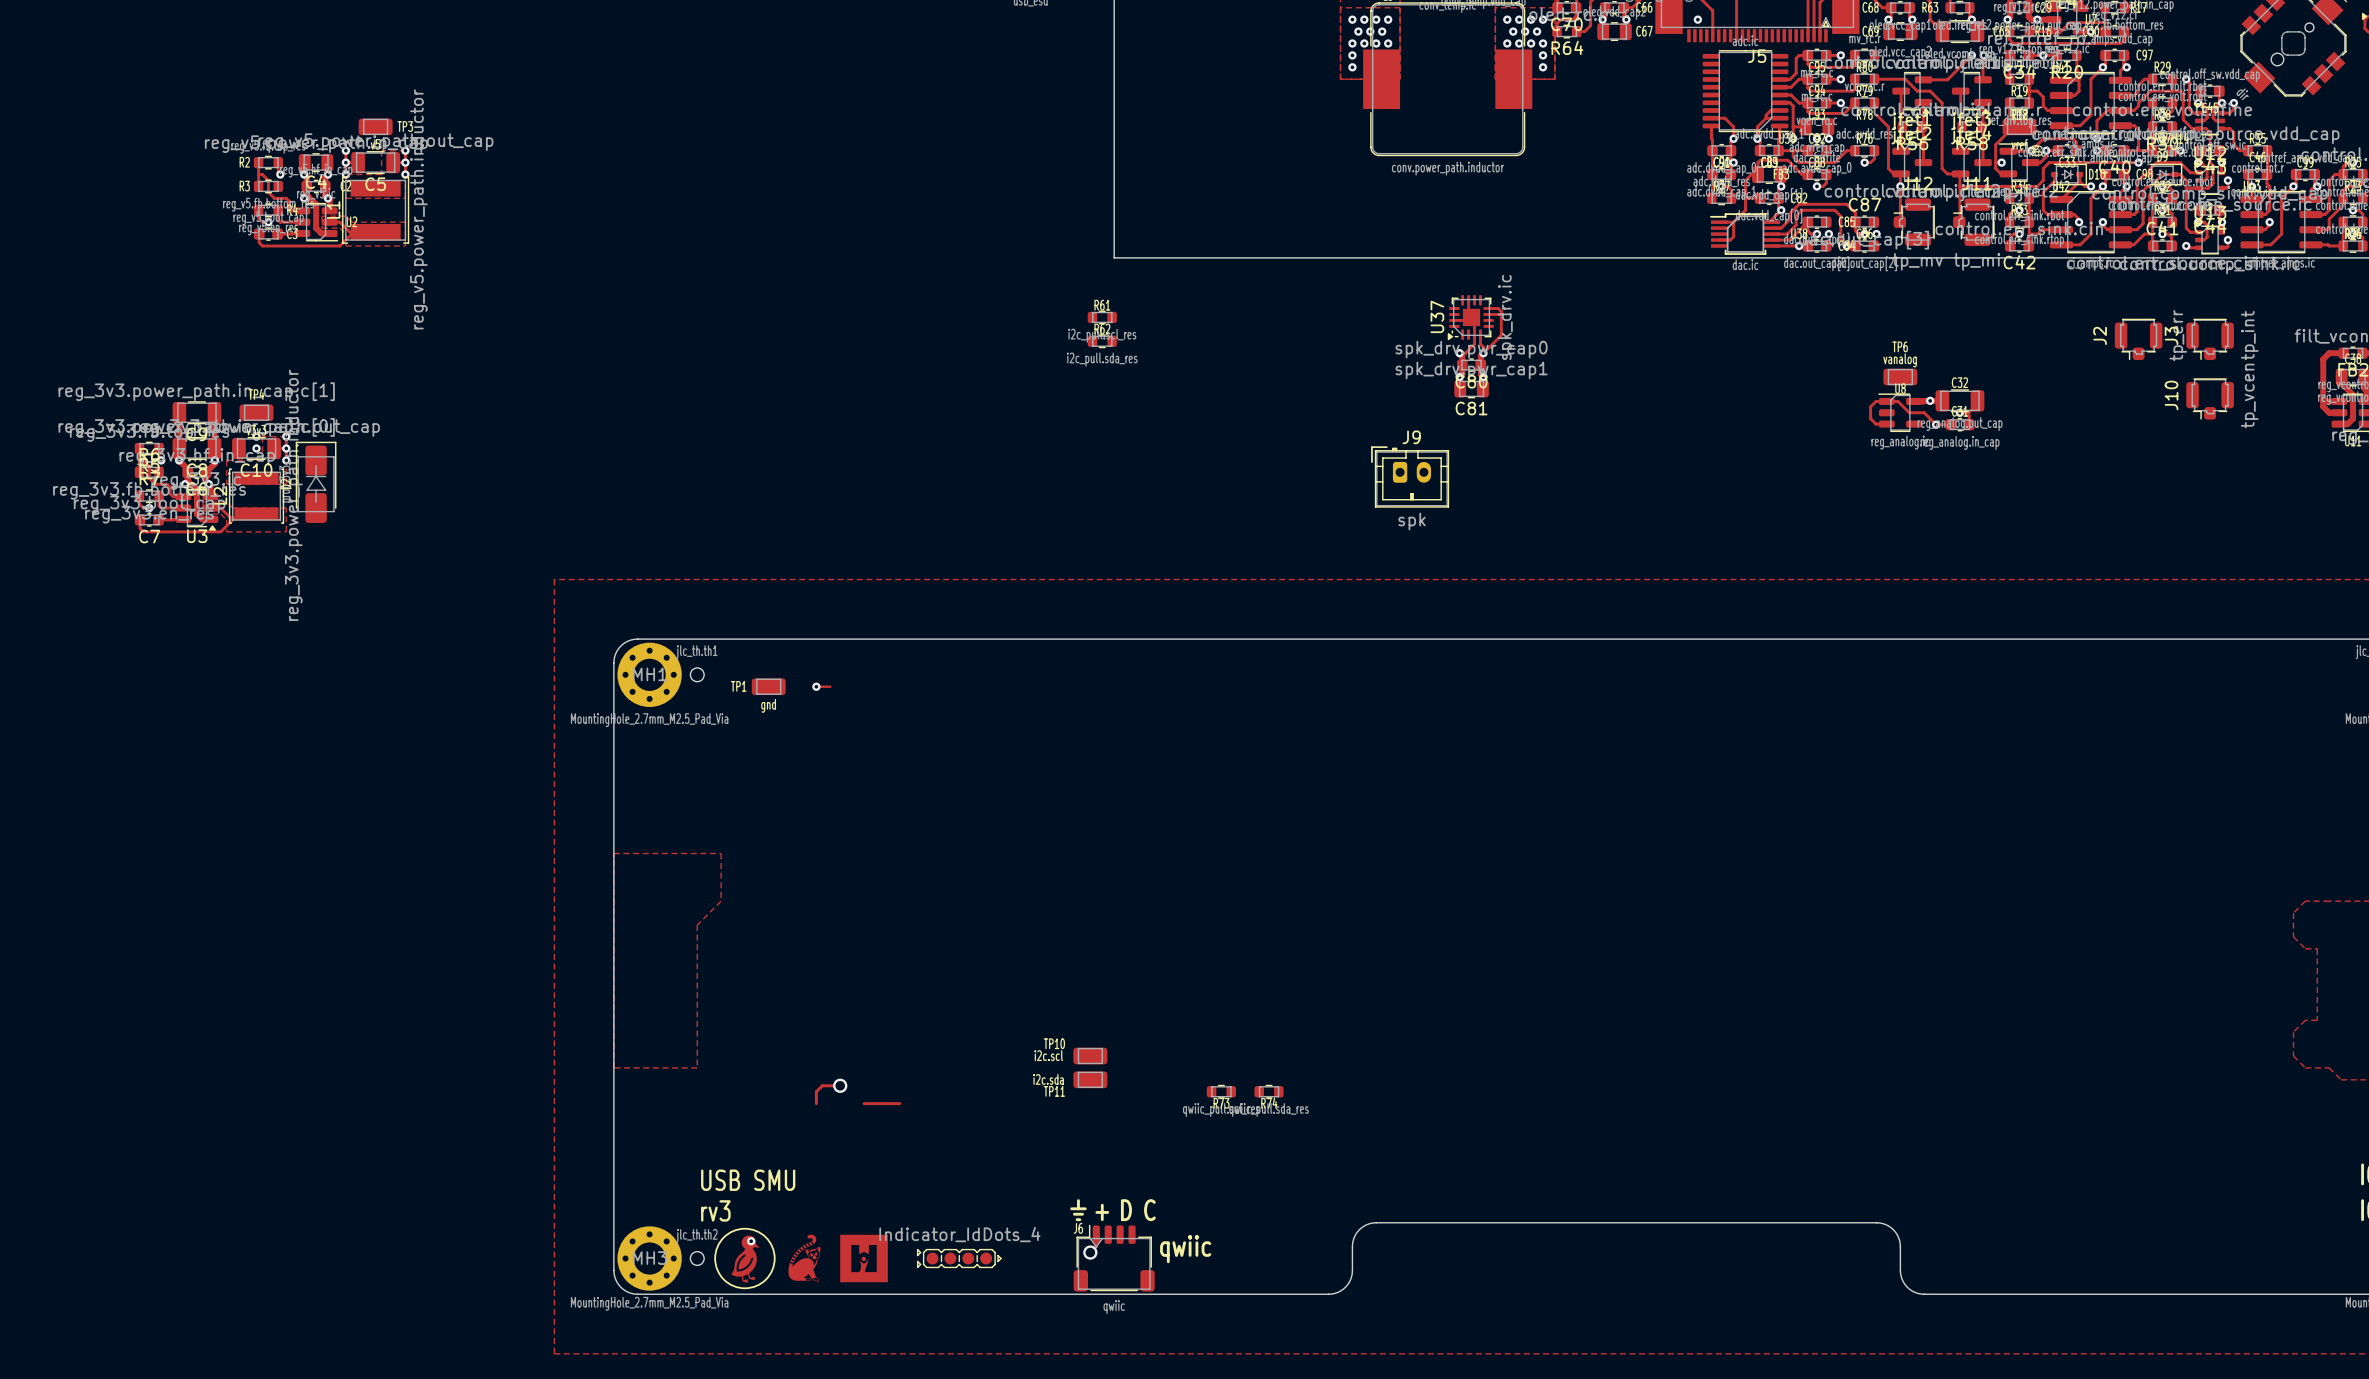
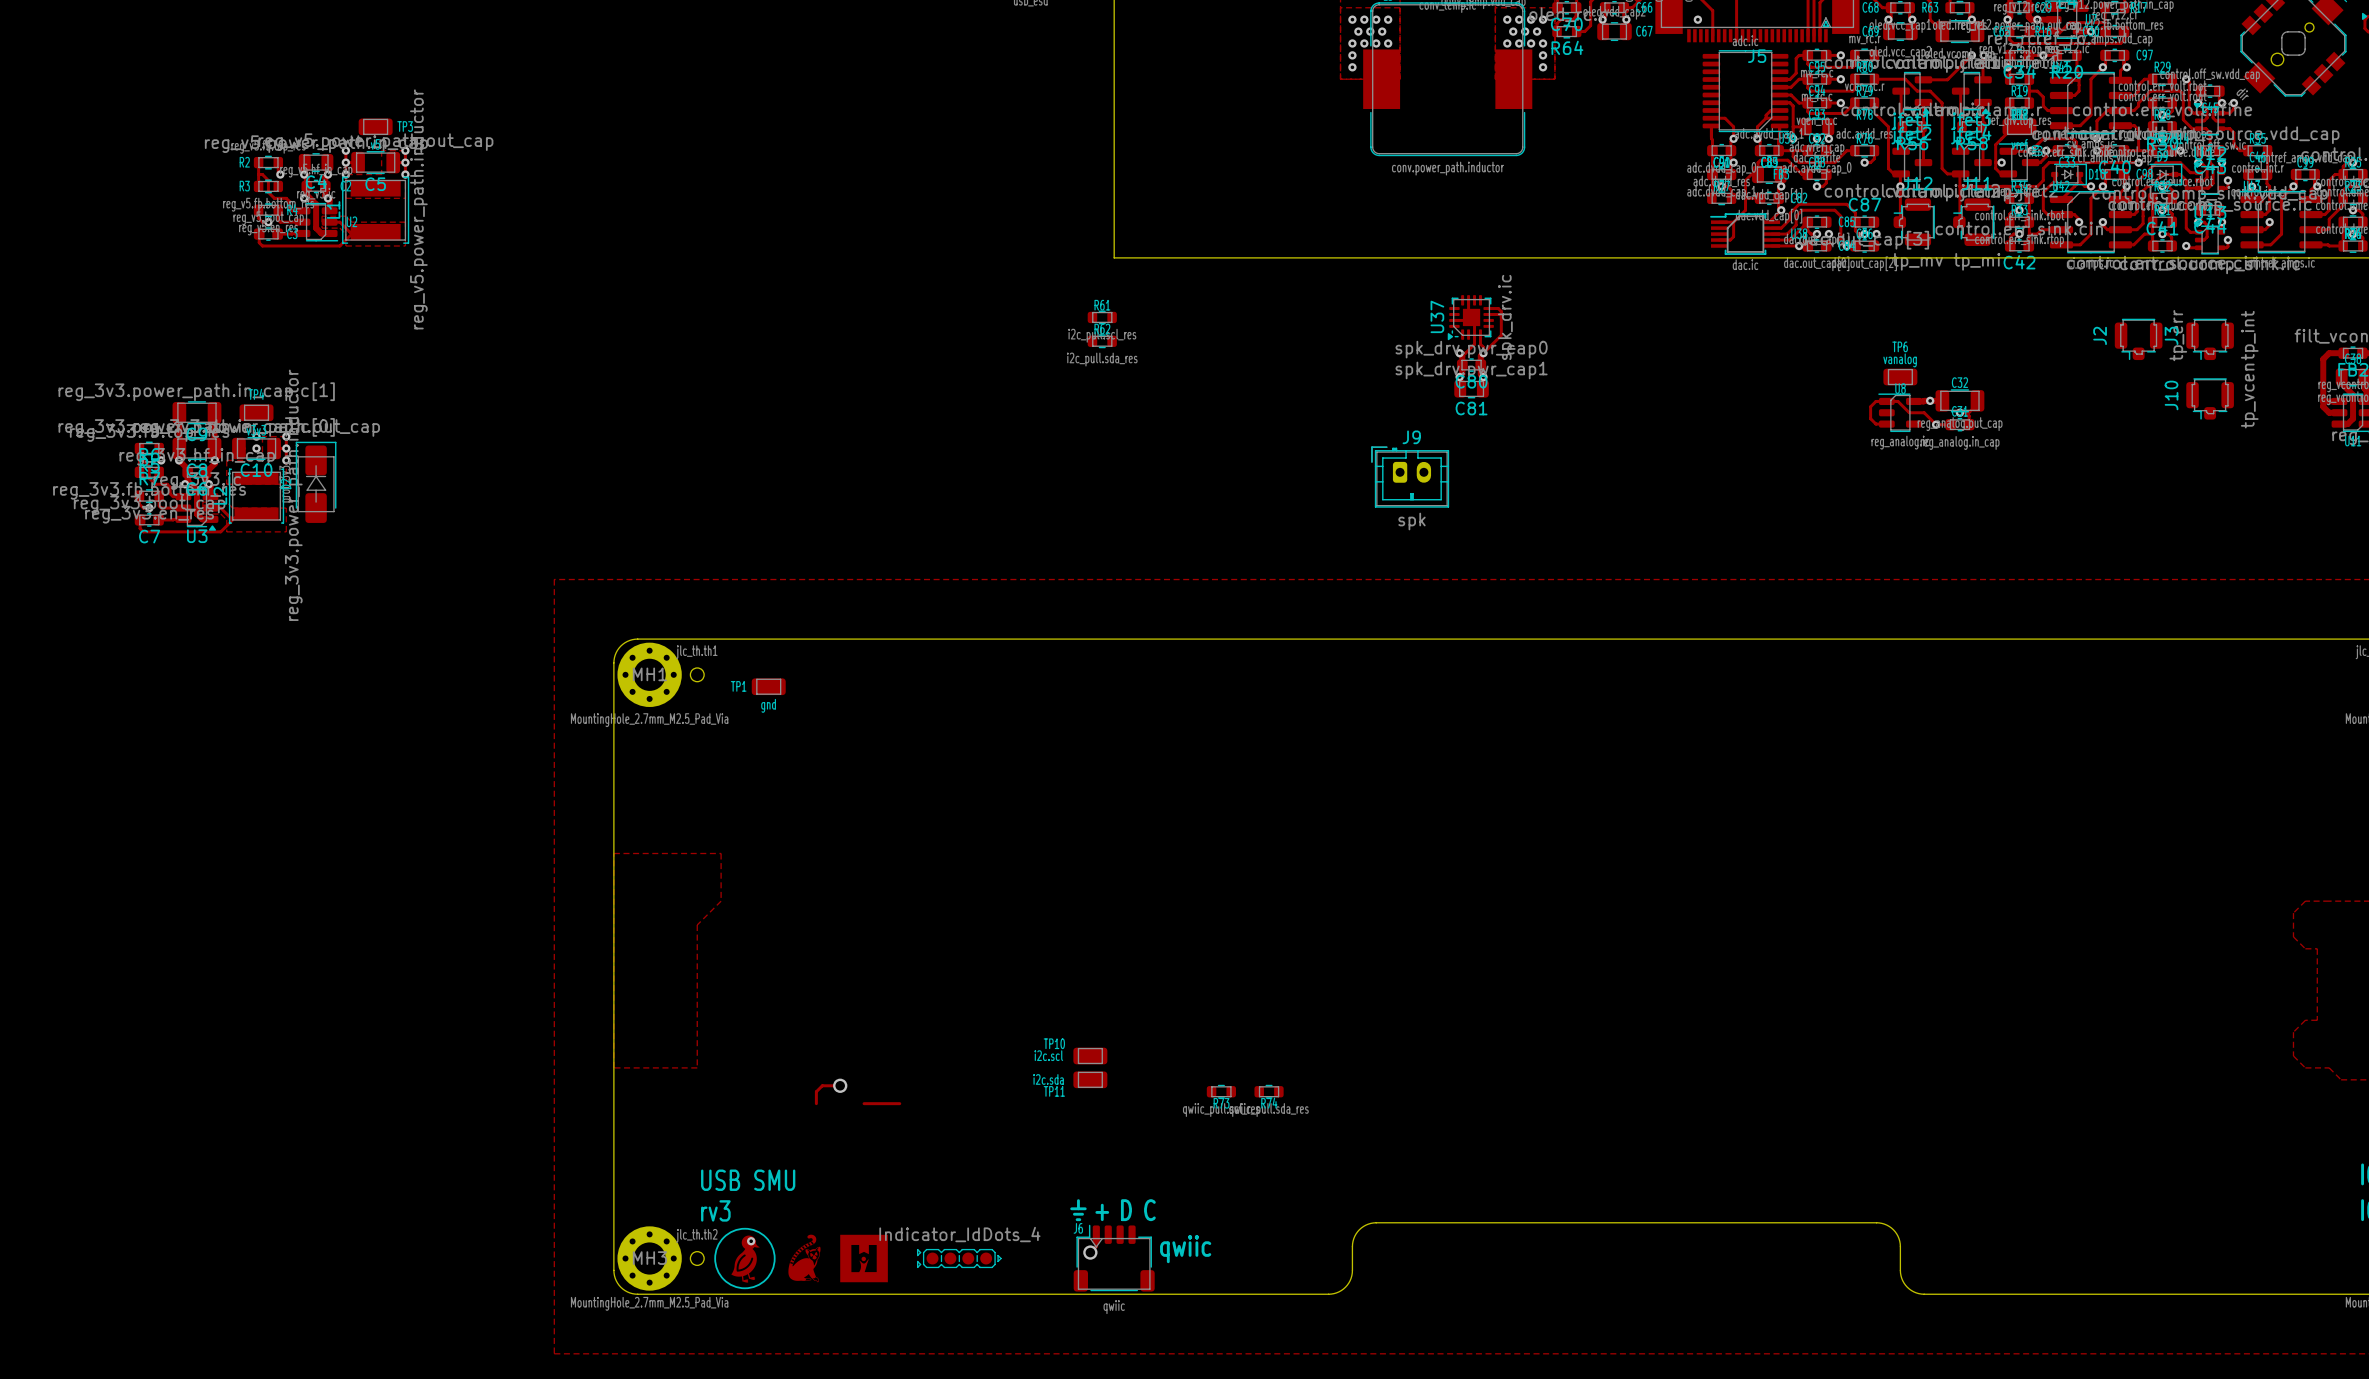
track: (816, 686) (830, 686) -> none
via: (816, 686) -> none

